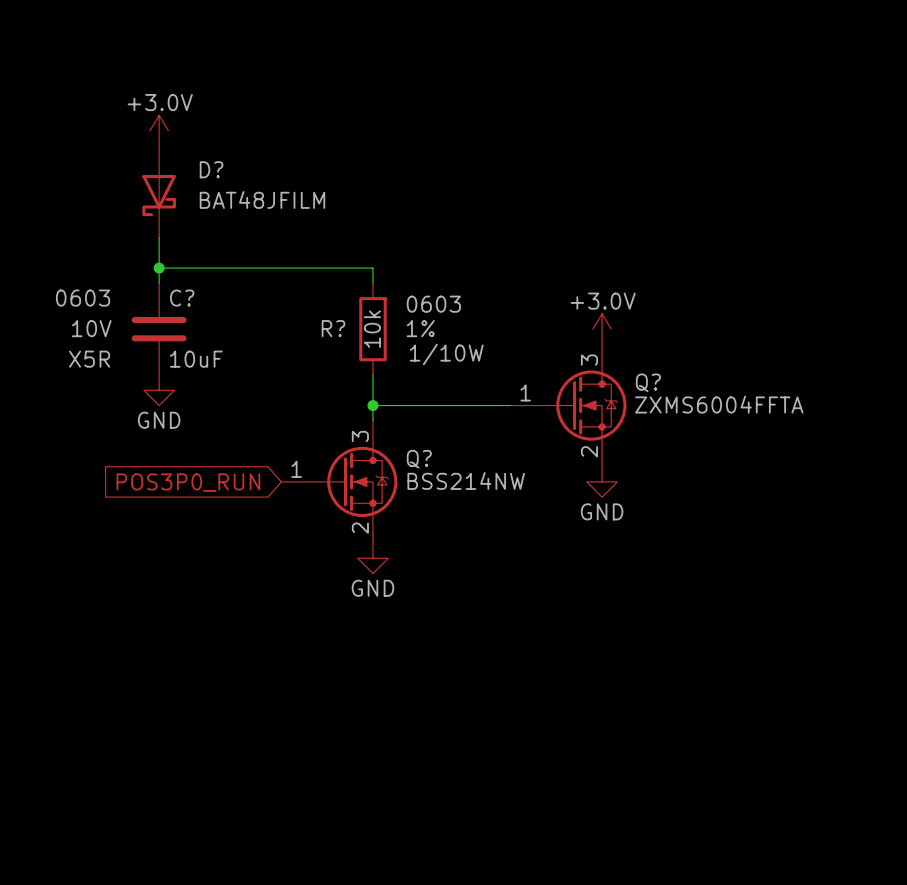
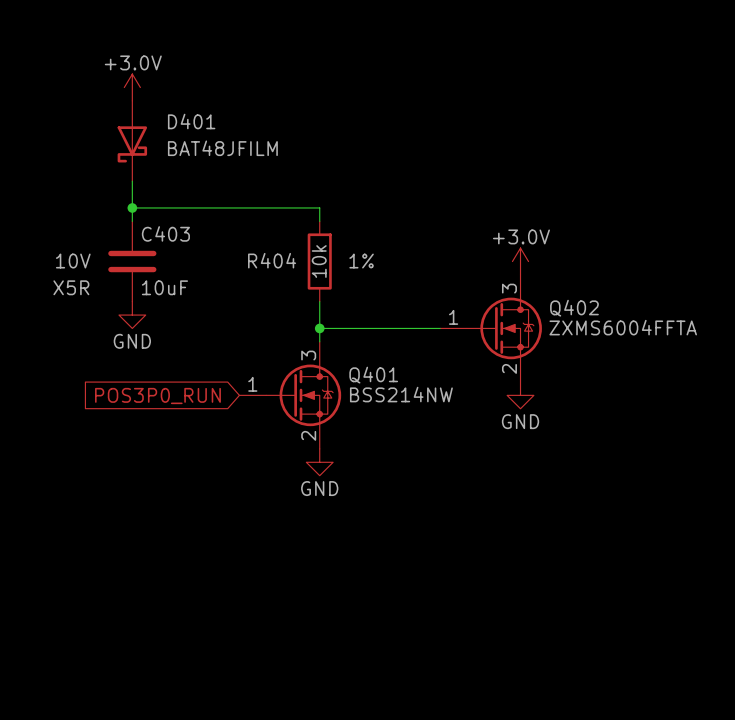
D? name: D? (211, 169) -> D401 (191, 121)
C? text: 0603 (83, 298) -> none
C? name: C? (182, 298) -> C403 (165, 233)
R? text: 0603 (433, 304) -> none
R? name: R? (333, 328) -> R404 (272, 260)
R? text: 1/10W (446, 354) -> none
Q? name: Q? (648, 382) -> Q402 (574, 308)
Q? name: Q? (419, 459) -> Q401 (373, 375)

